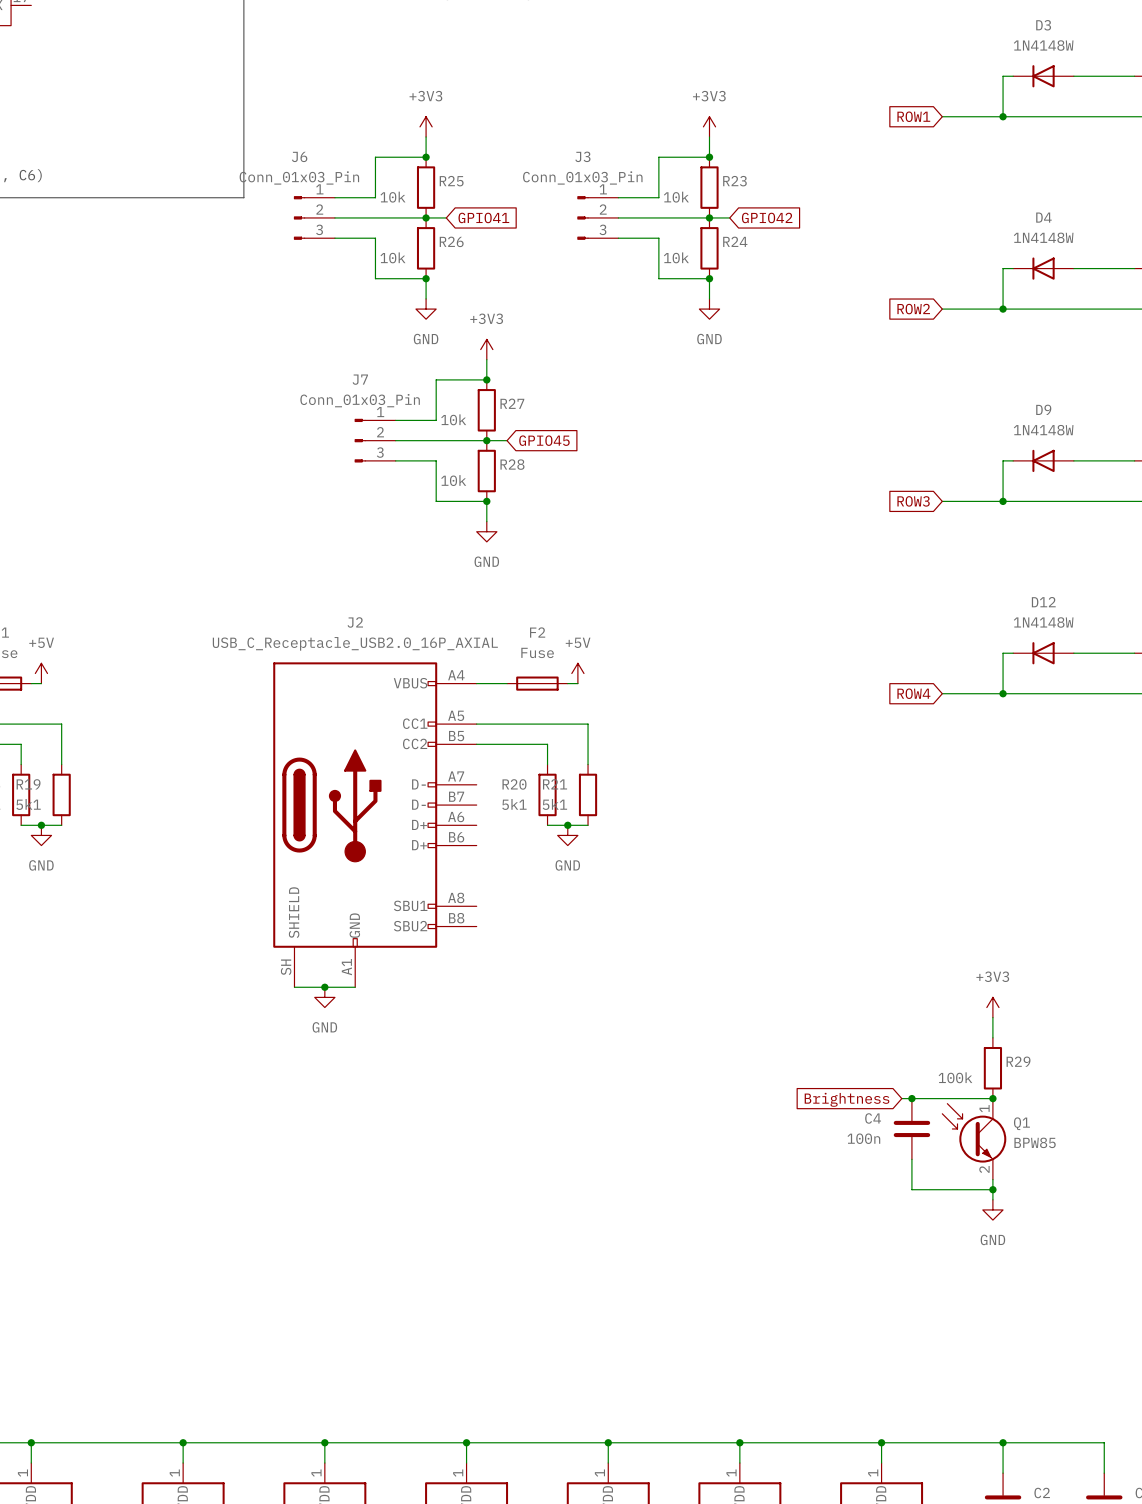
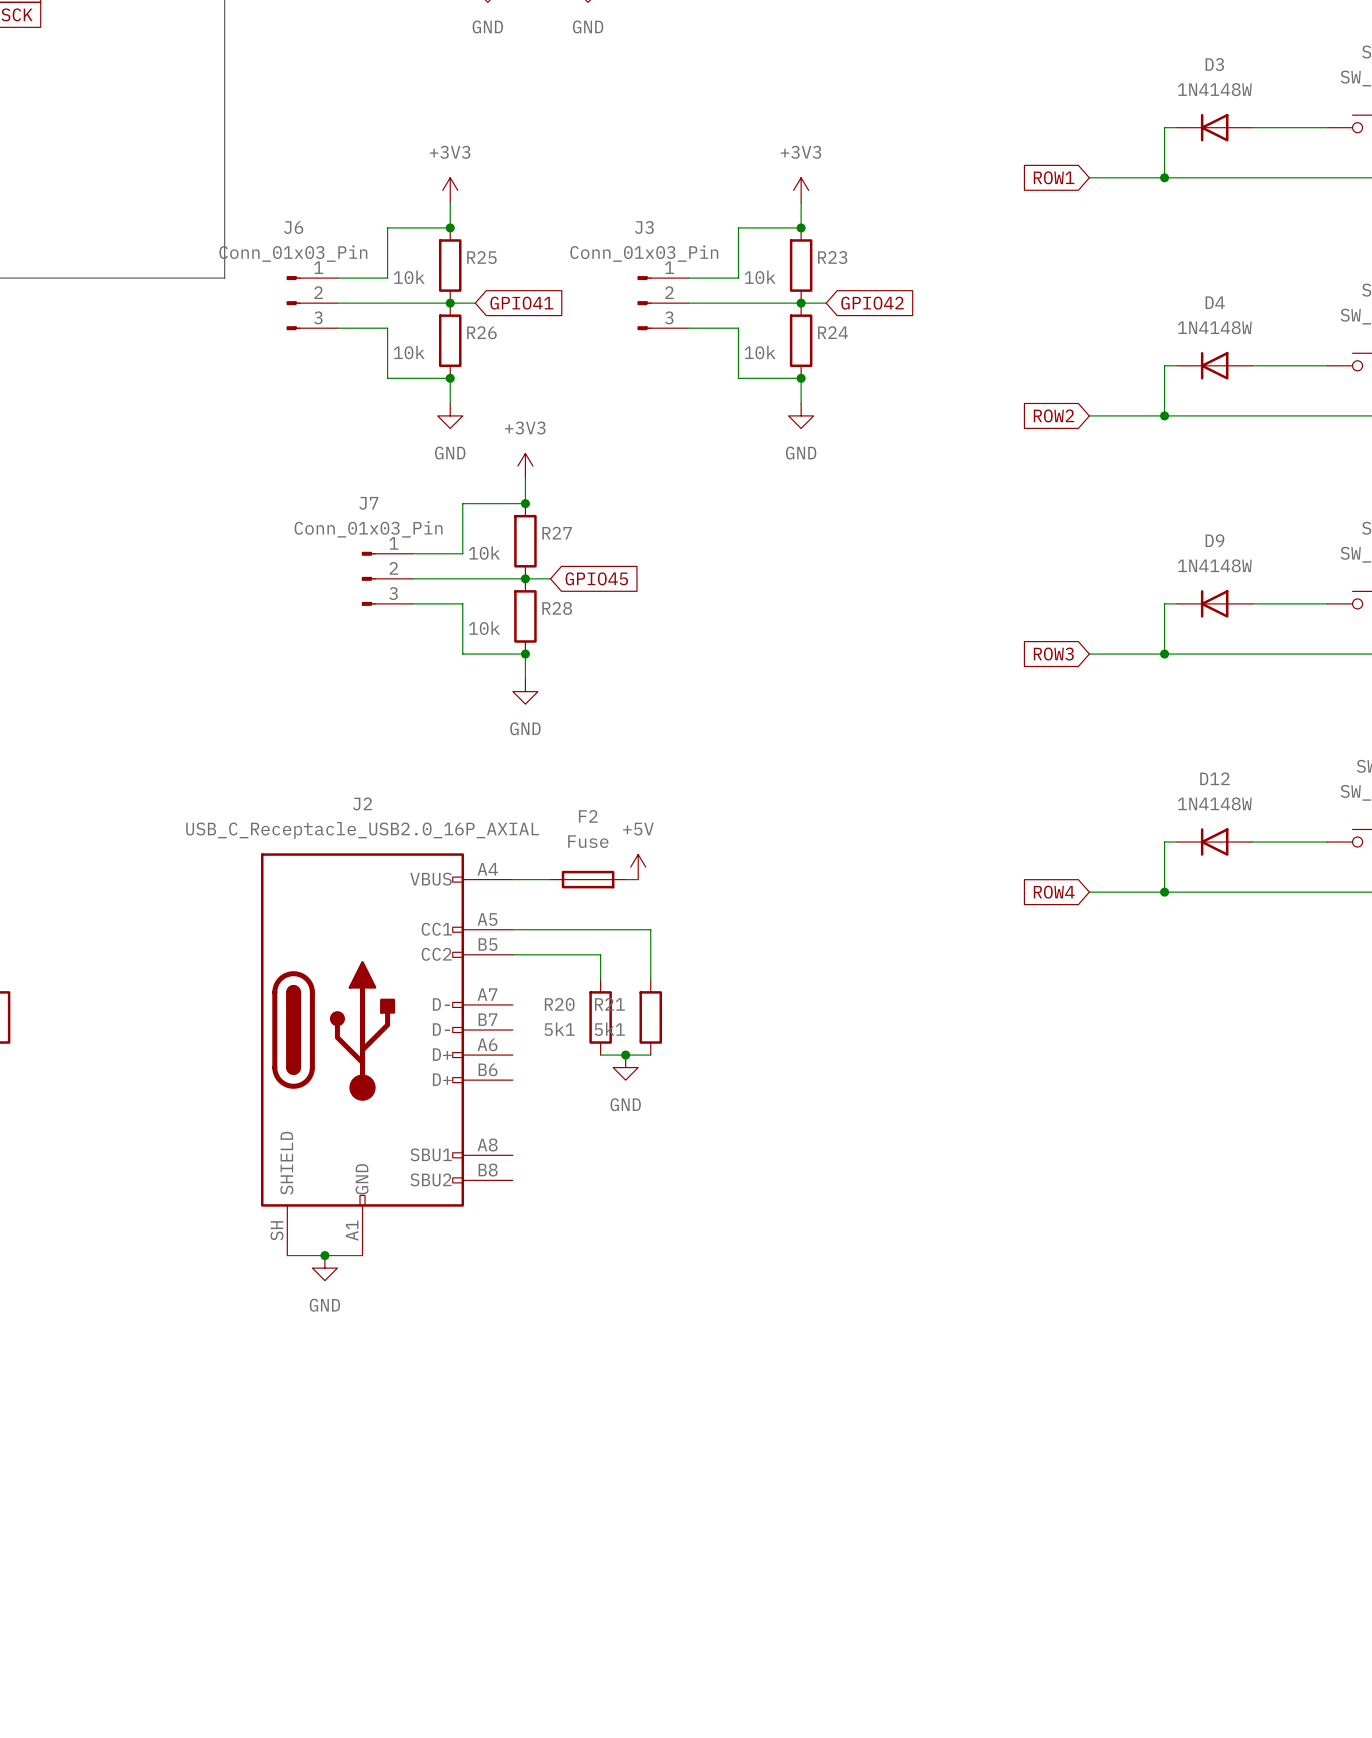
power symbol: +3V3 (992, 1007) -> none
wire: (992, 1017) (992, 1037) -> none
R29: 100k (992, 1068) -> none
wire: (901, 1098) (992, 1098) -> none
junction: (911, 1098) -> none
junction: (992, 1098) -> none
global label: Brightness (847, 1099) -> none
C4: 100n (911, 1128) -> none
Q1: BPW85 (974, 1139) -> none
wire: (911, 1159) (911, 1189) (992, 1189) -> none
wire: (992, 1179) (992, 1199) -> none
junction: (992, 1189) -> none
power symbol: GND (992, 1209) -> none

